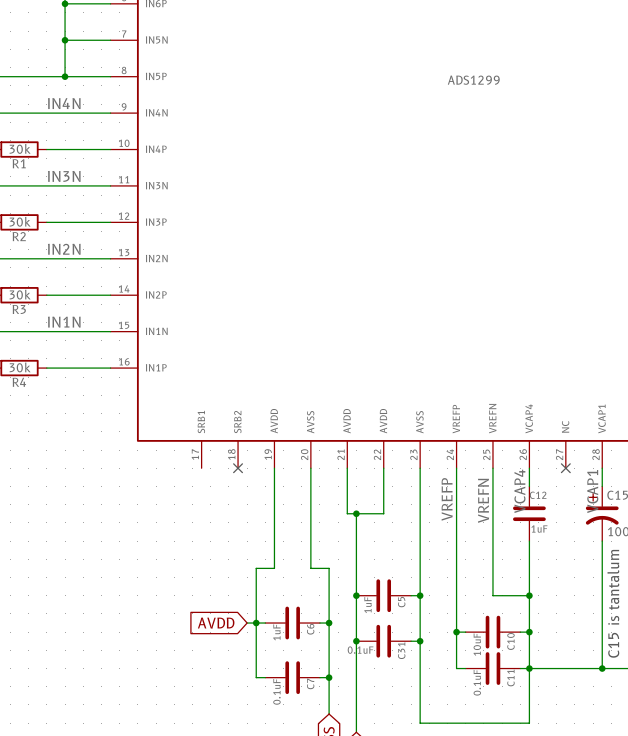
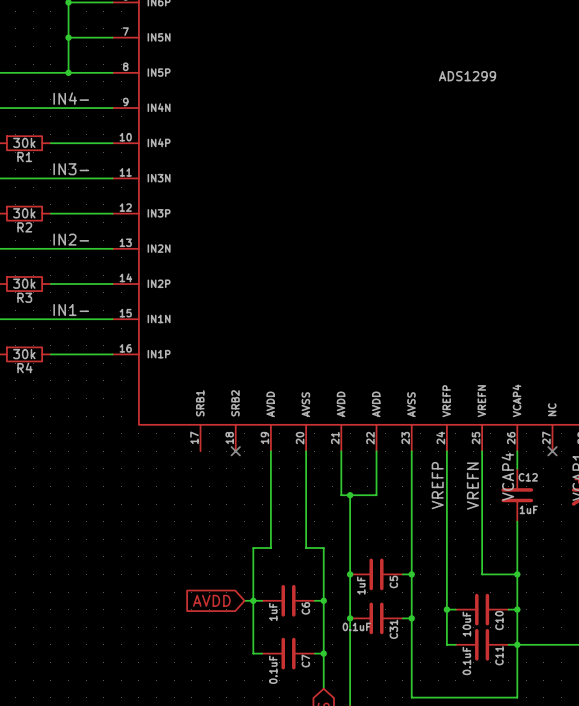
label: IN4N (64, 103) -> IN4- (71, 98)
label: IN3N (64, 176) -> IN3- (71, 169)
label: IN2N (64, 249) -> IN2- (71, 239)
label: IN1N (64, 322) -> IN1- (71, 310)

